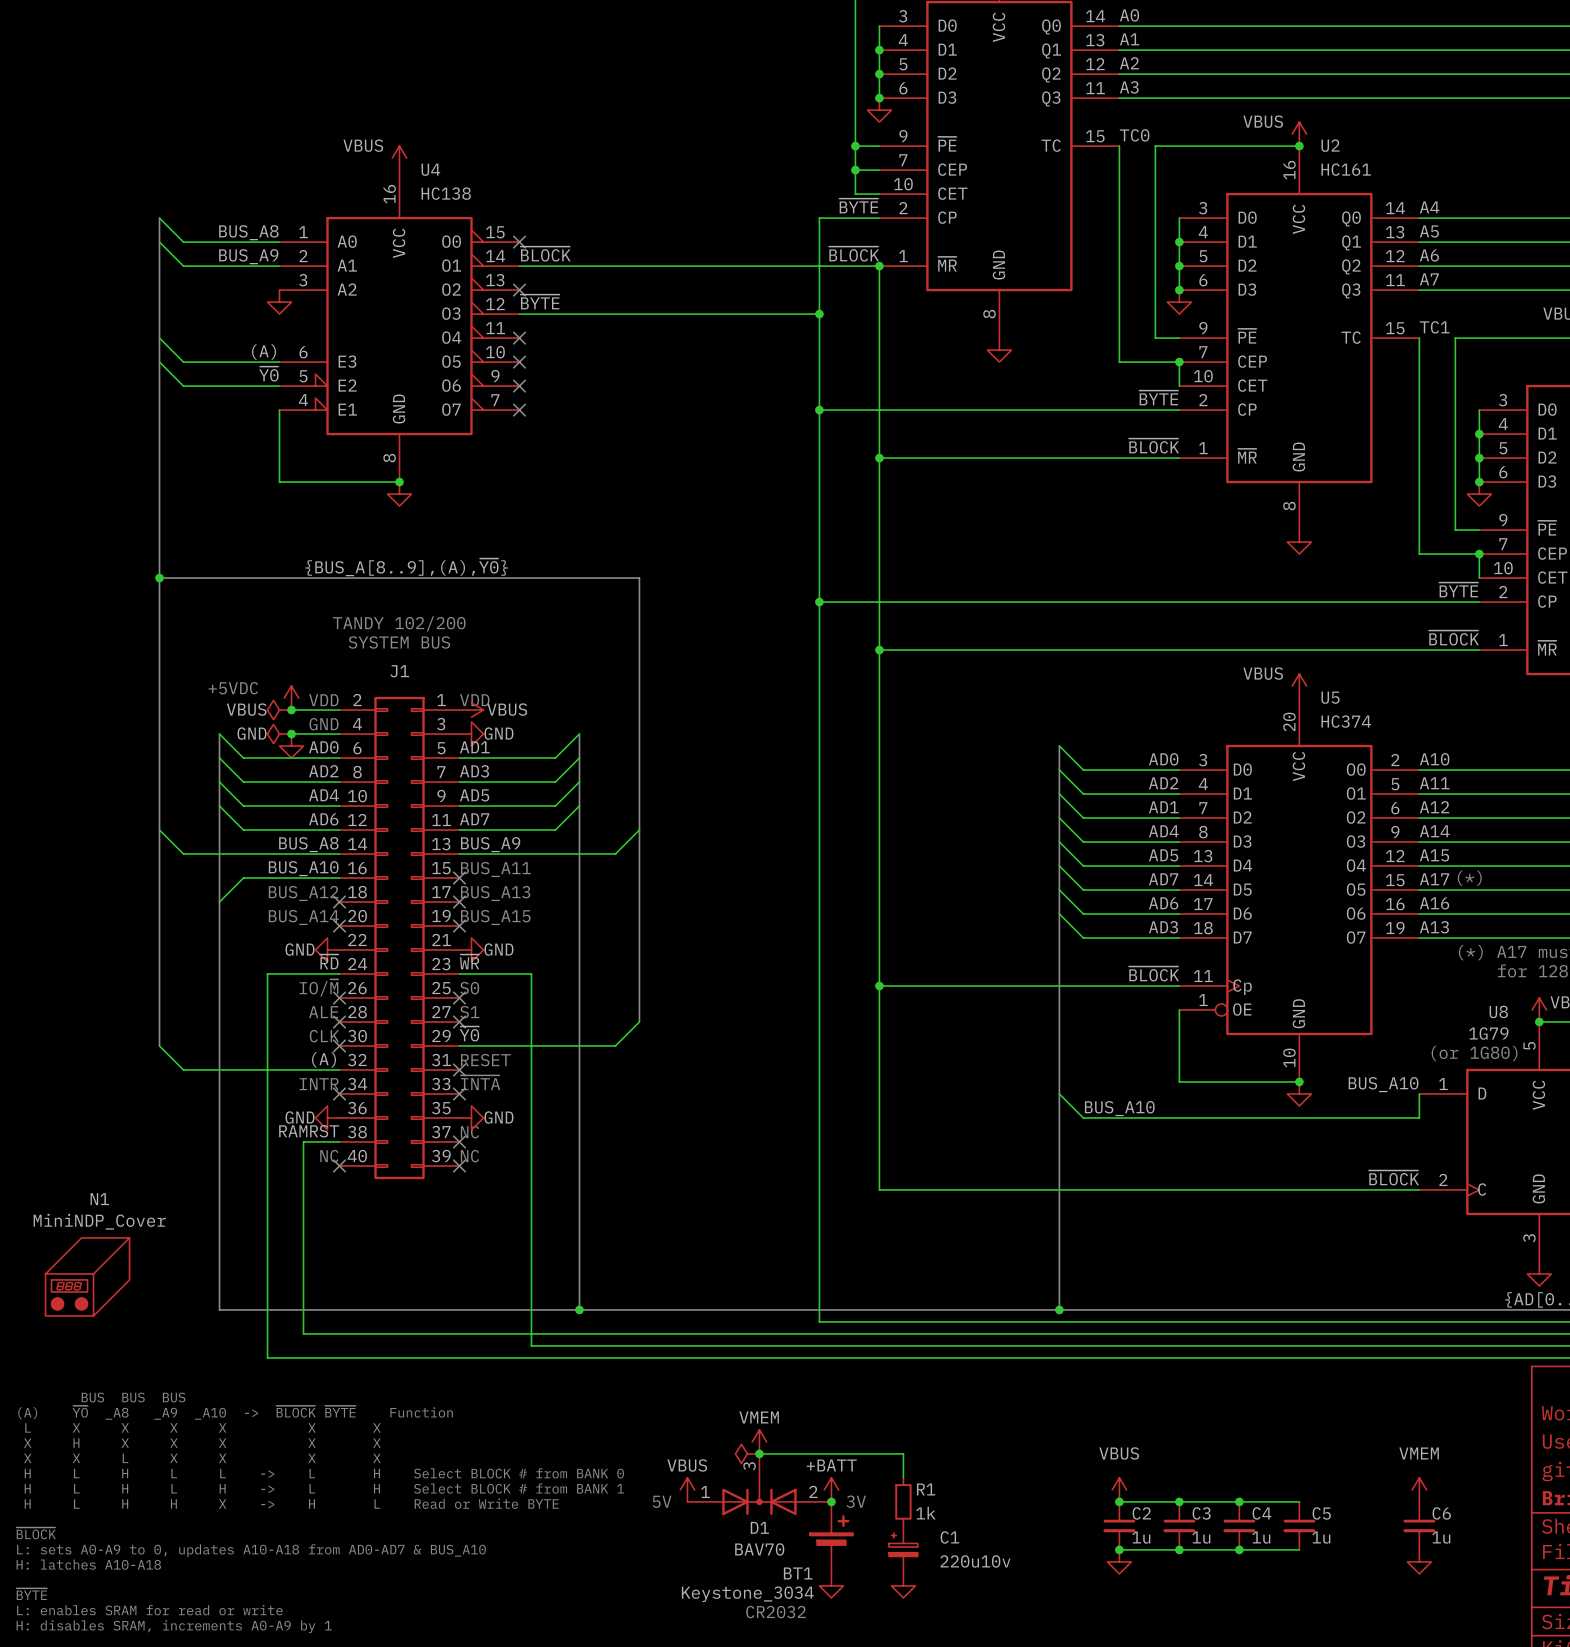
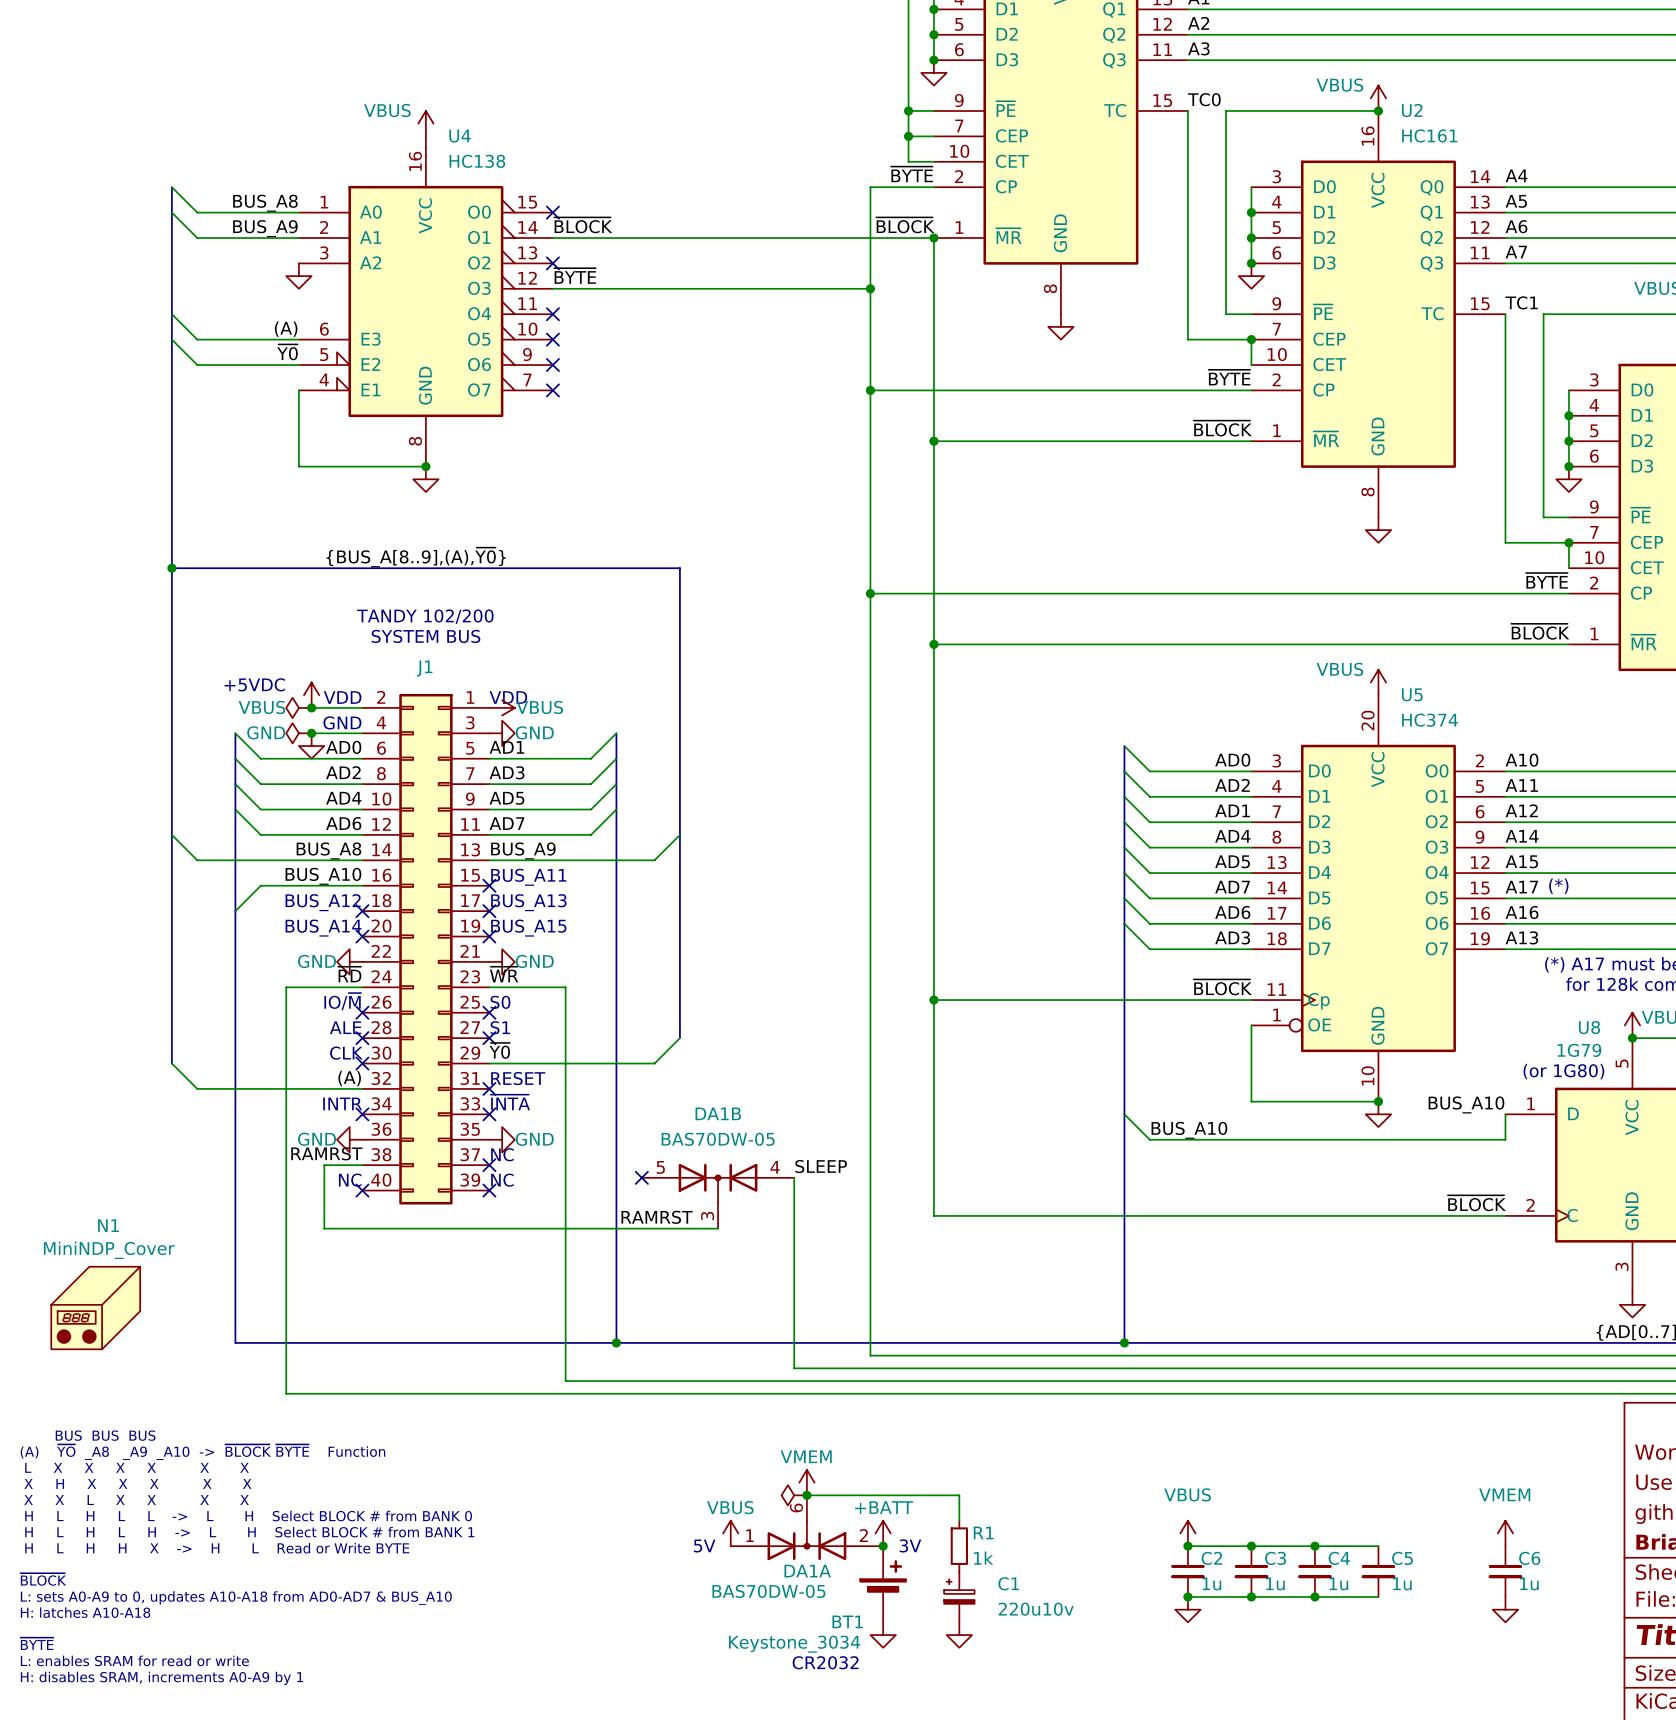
label: none -> SLEEP (821, 1166)
no-connect mark: none -> (641, 1177)
wire: none -> (794, 1177) (794, 1368)
DA1B: none -> BAS70DW-05 (718, 1196)
label: none -> RAMRST (657, 1217)
wire: (303, 1201) (303, 1333) (747, 1333) -> (324, 1228) (718, 1228)
D1 pin number: 3 (749, 1466) -> 6 (796, 1507)
D1 name: D1 (759, 1527) -> DA1A (807, 1571)
D1 value: BAV70 (759, 1549) -> BAS70DW-05 (768, 1591)

